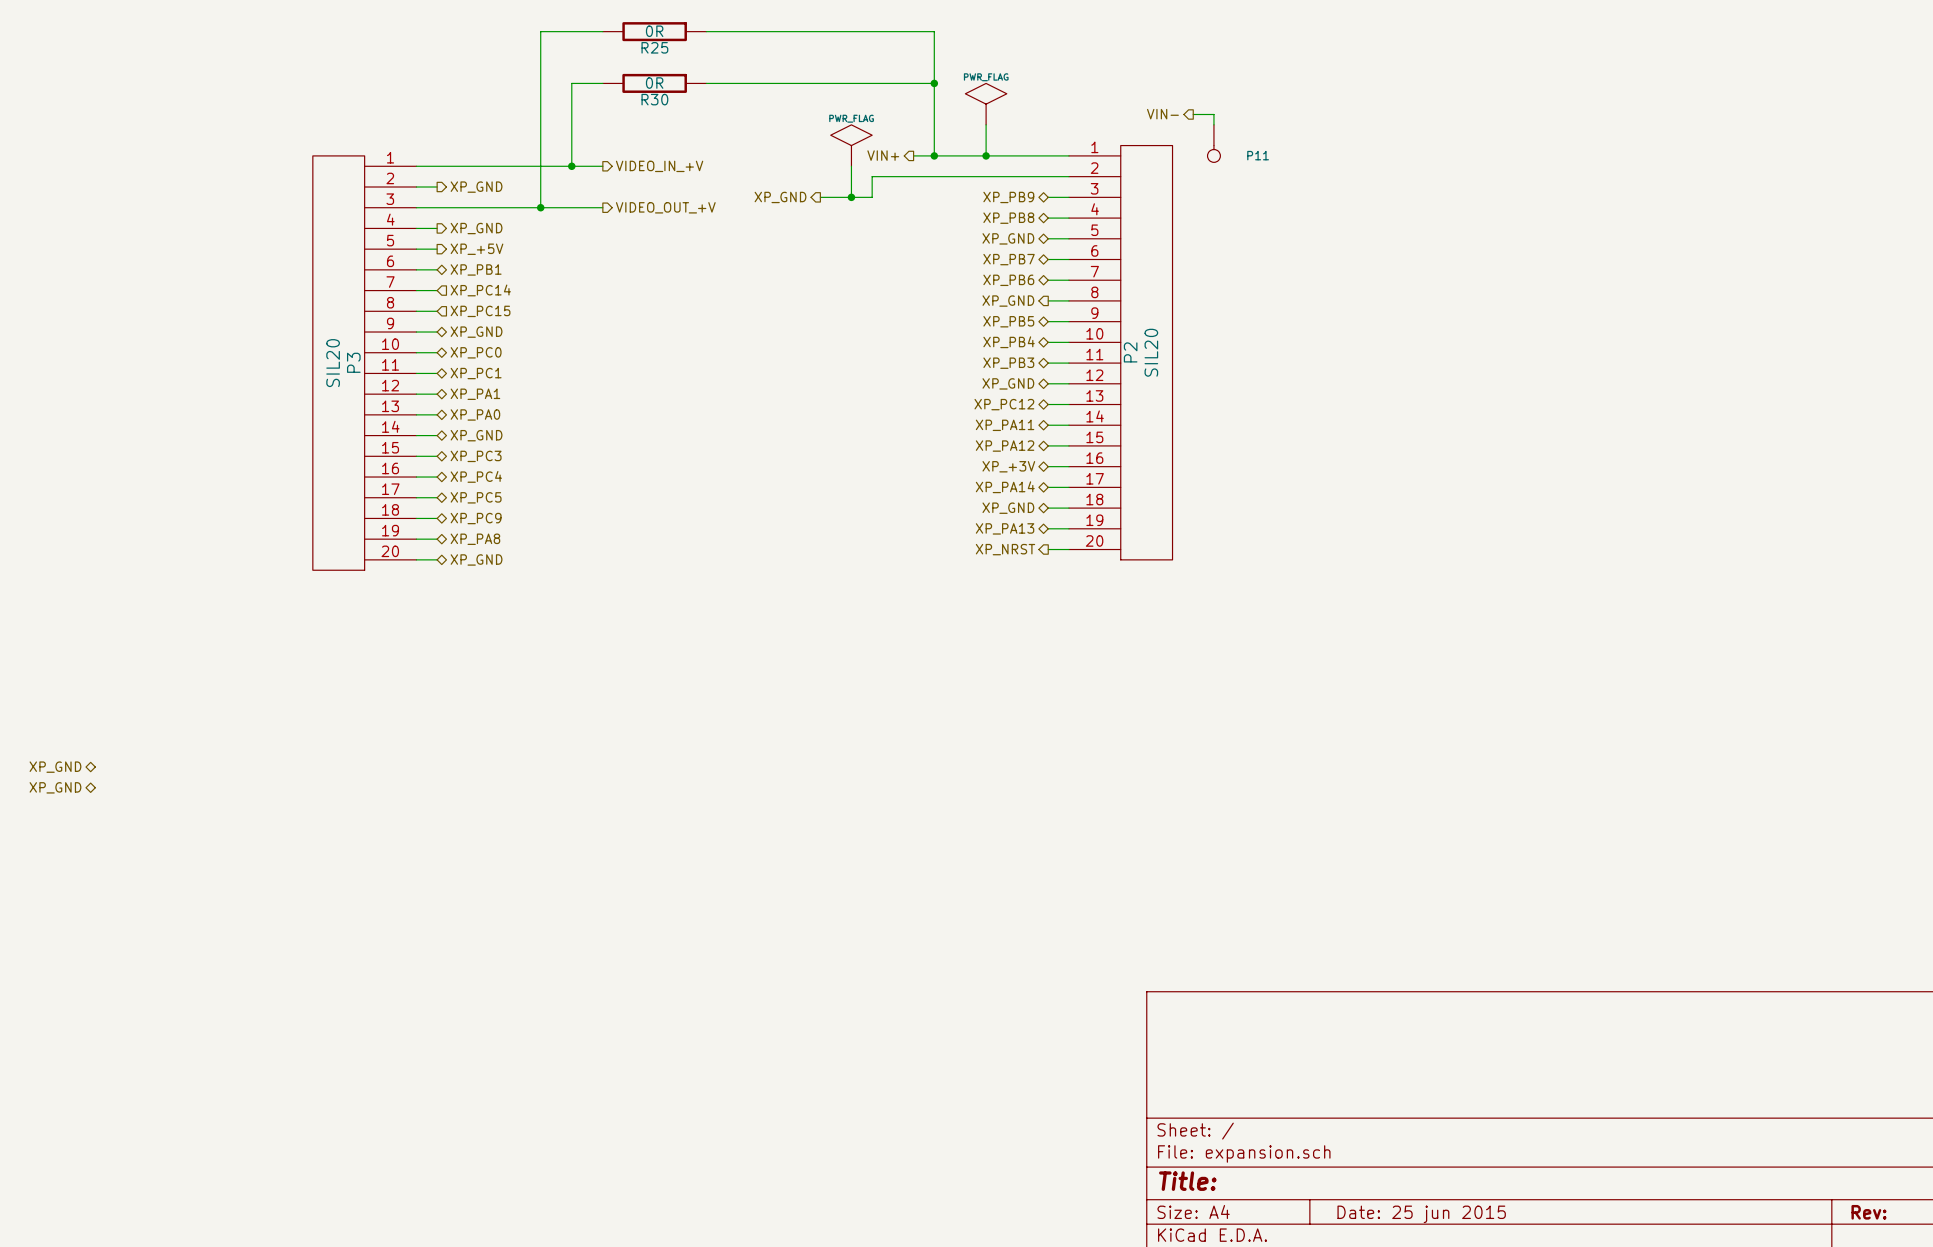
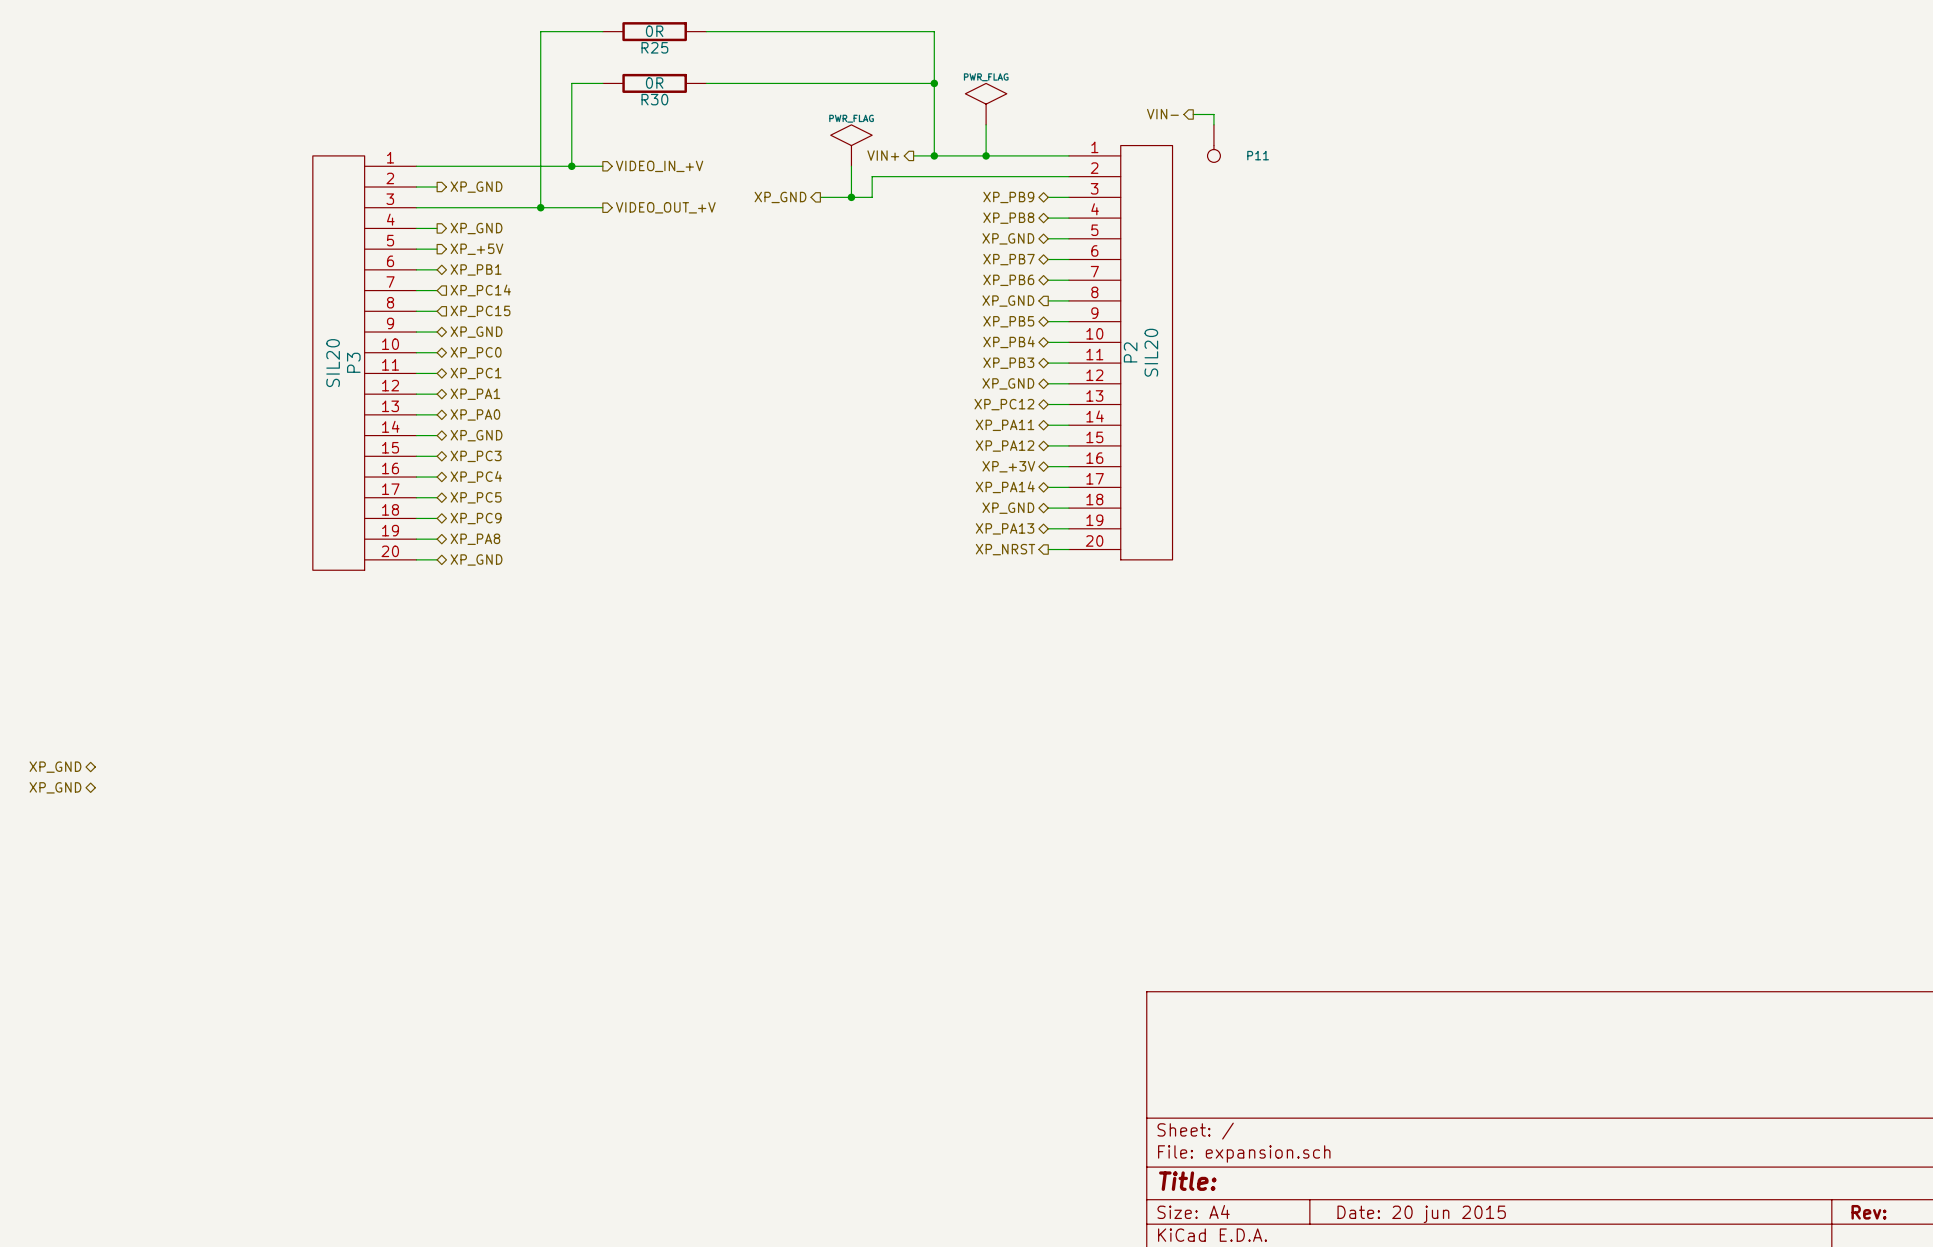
title block: Date: 25 jun 2015 (1421, 1214) -> Date: 20 jun 2015 (1421, 1214)

